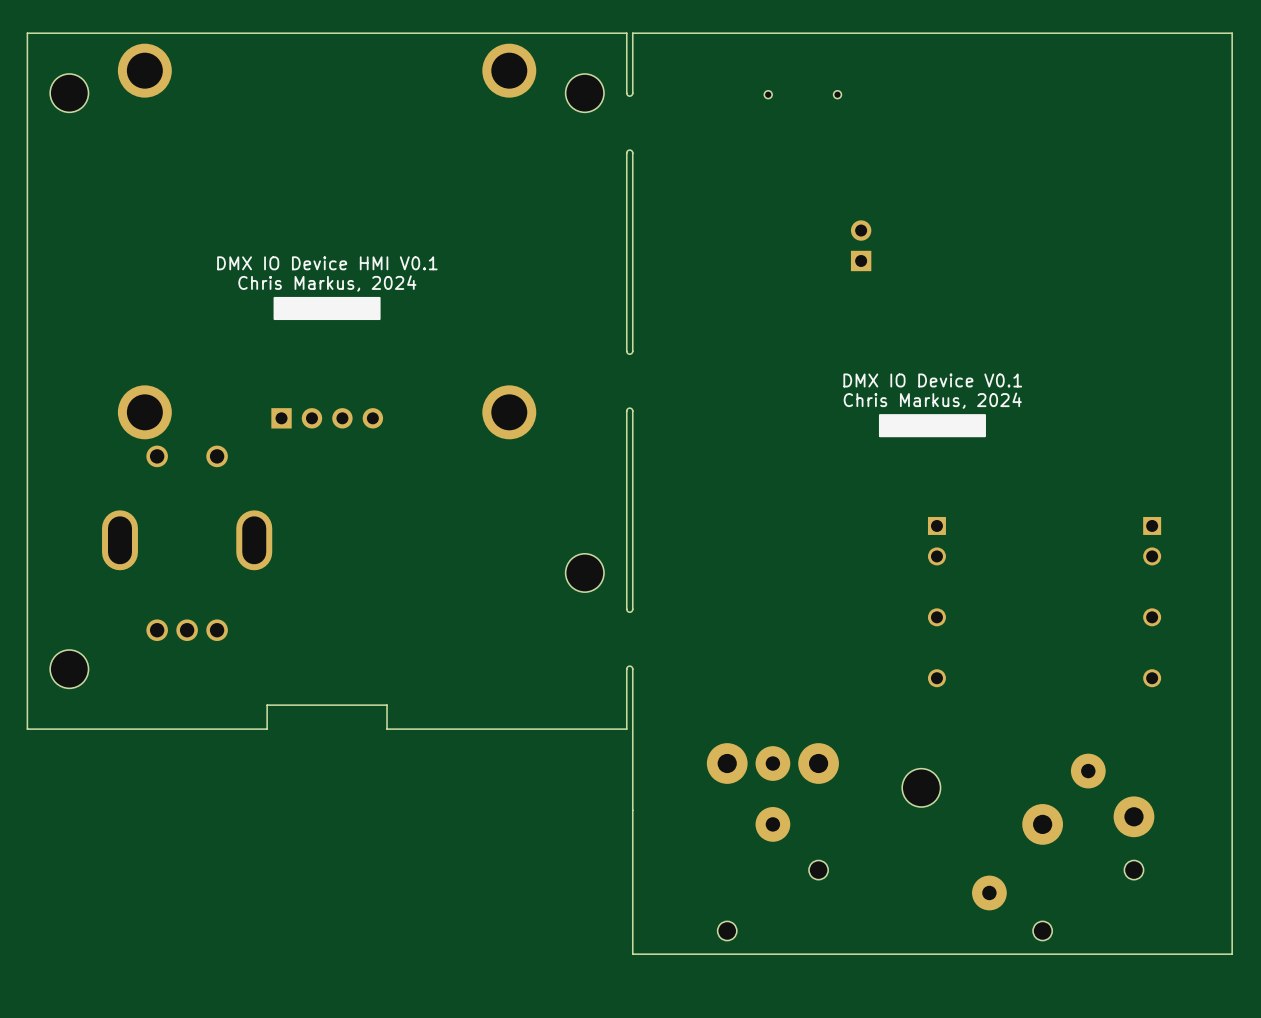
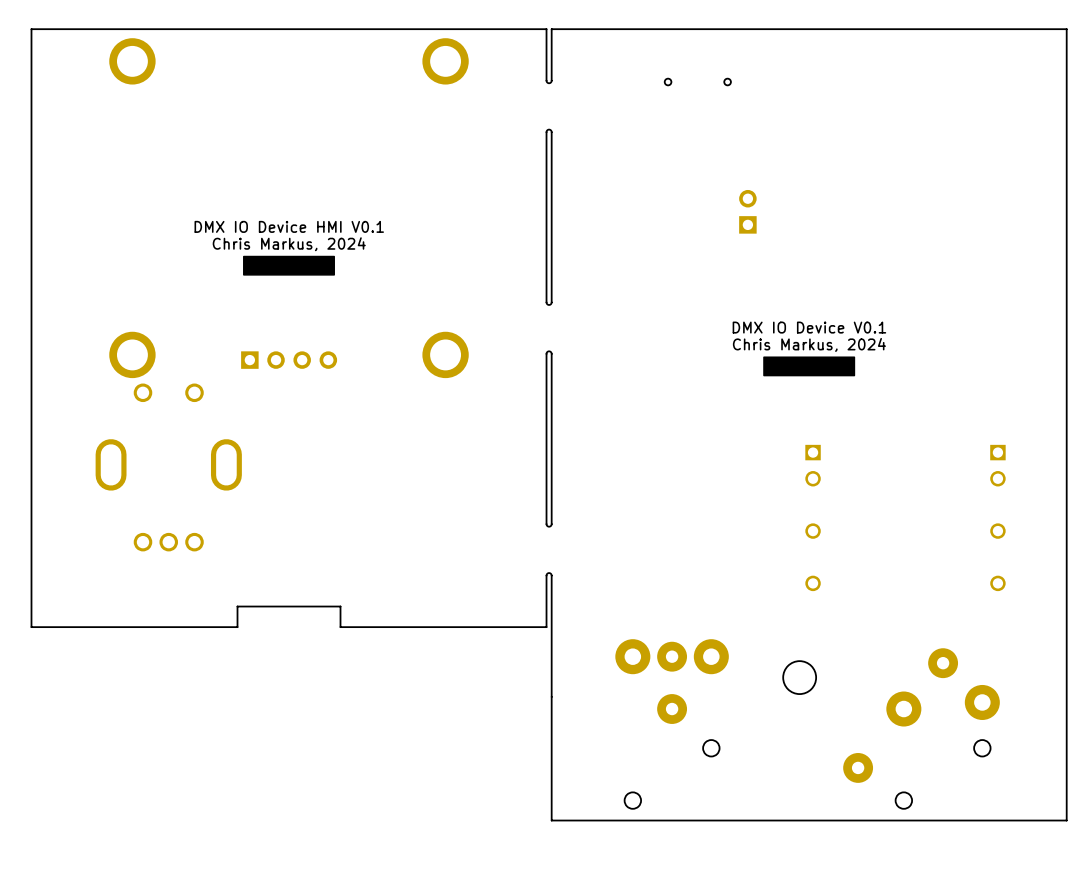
part: (69, 93) -> none
part: (584, 93) -> none
part: (584, 572) -> none
part: (69, 669) -> none

